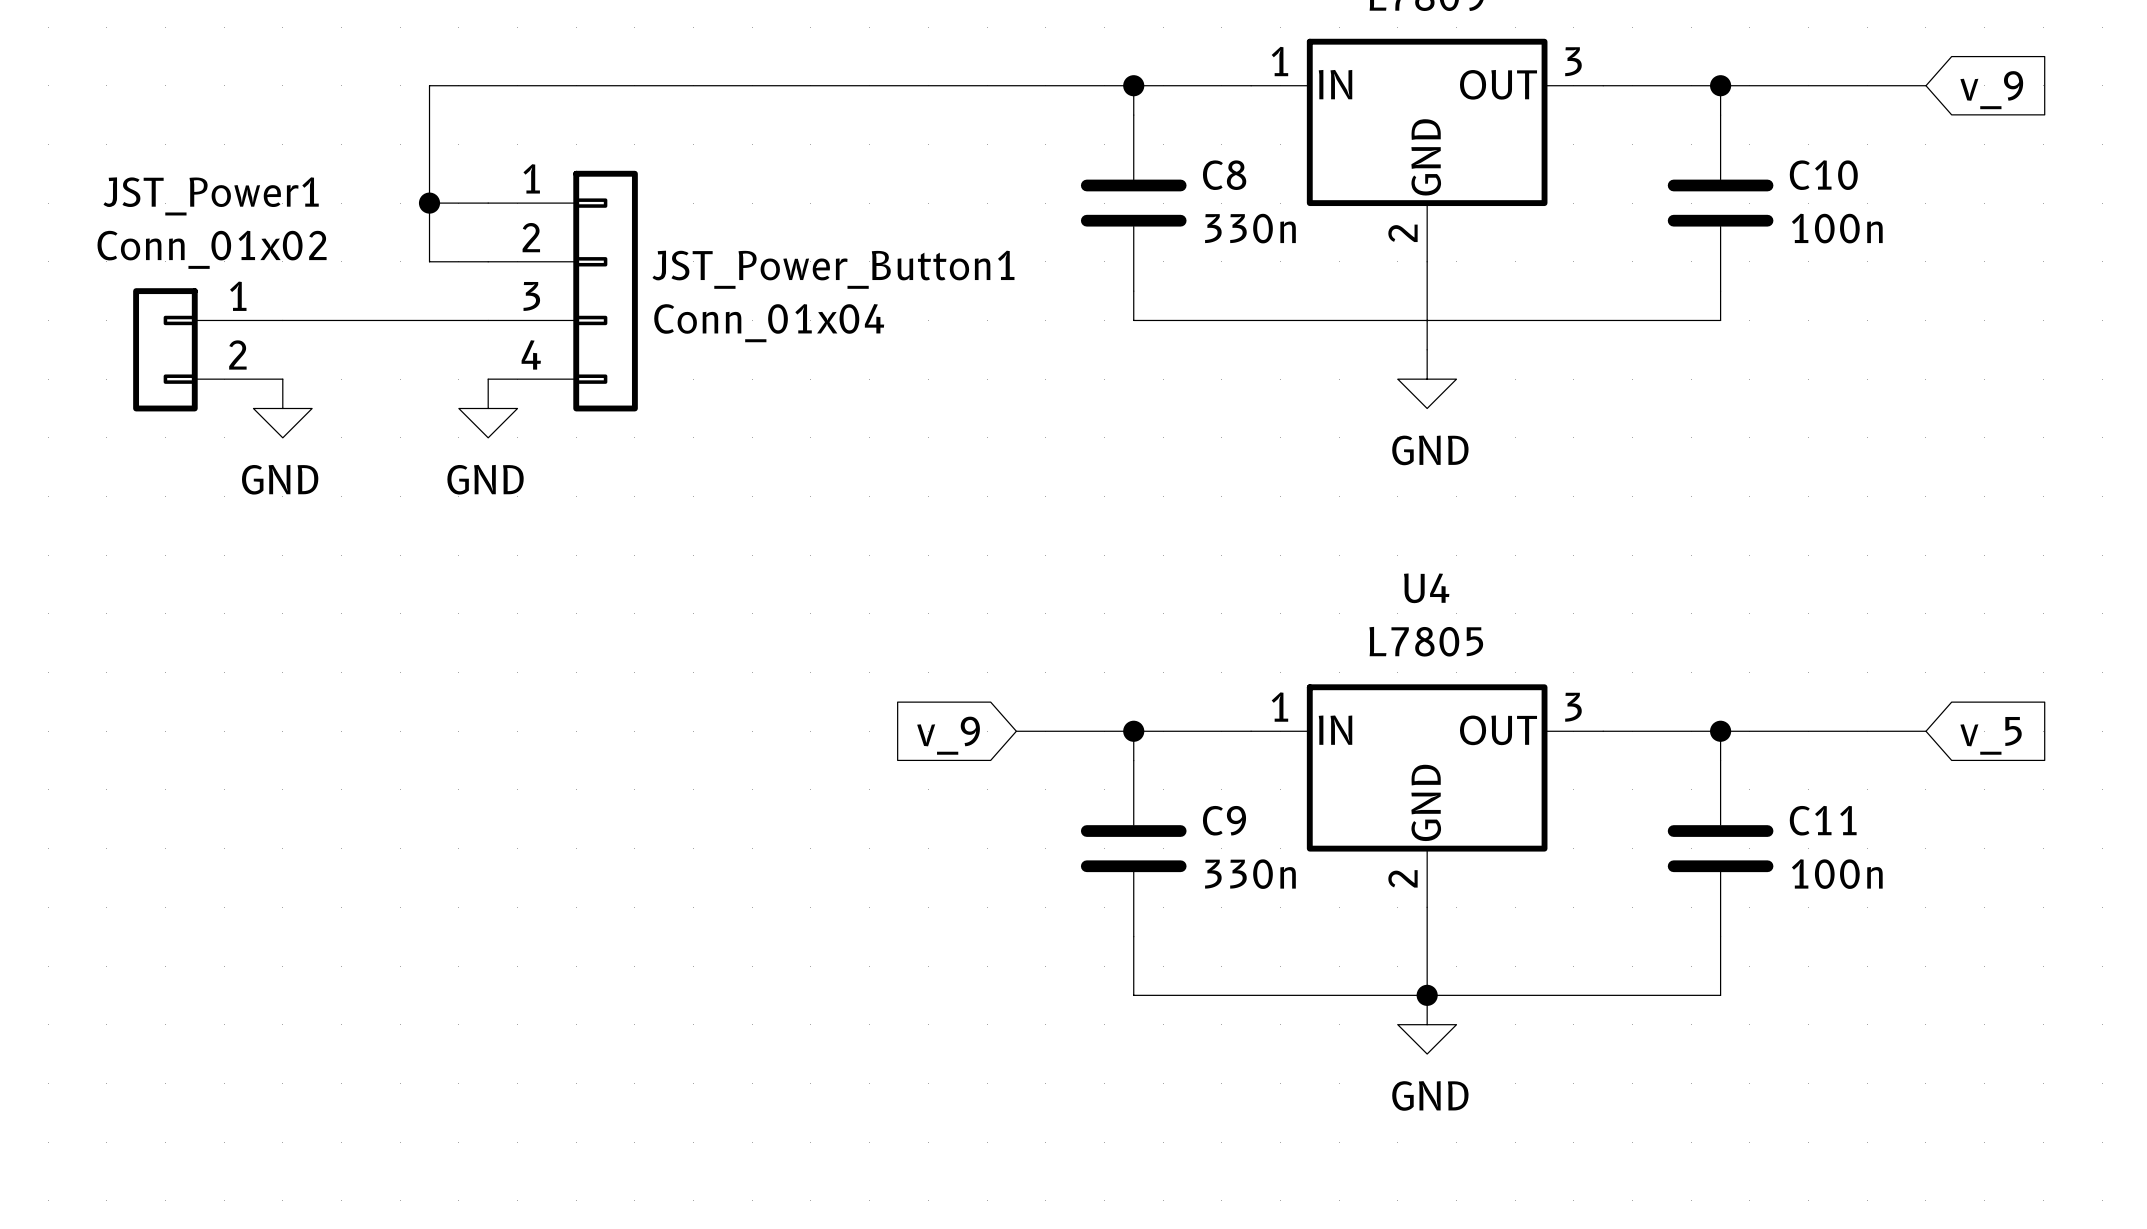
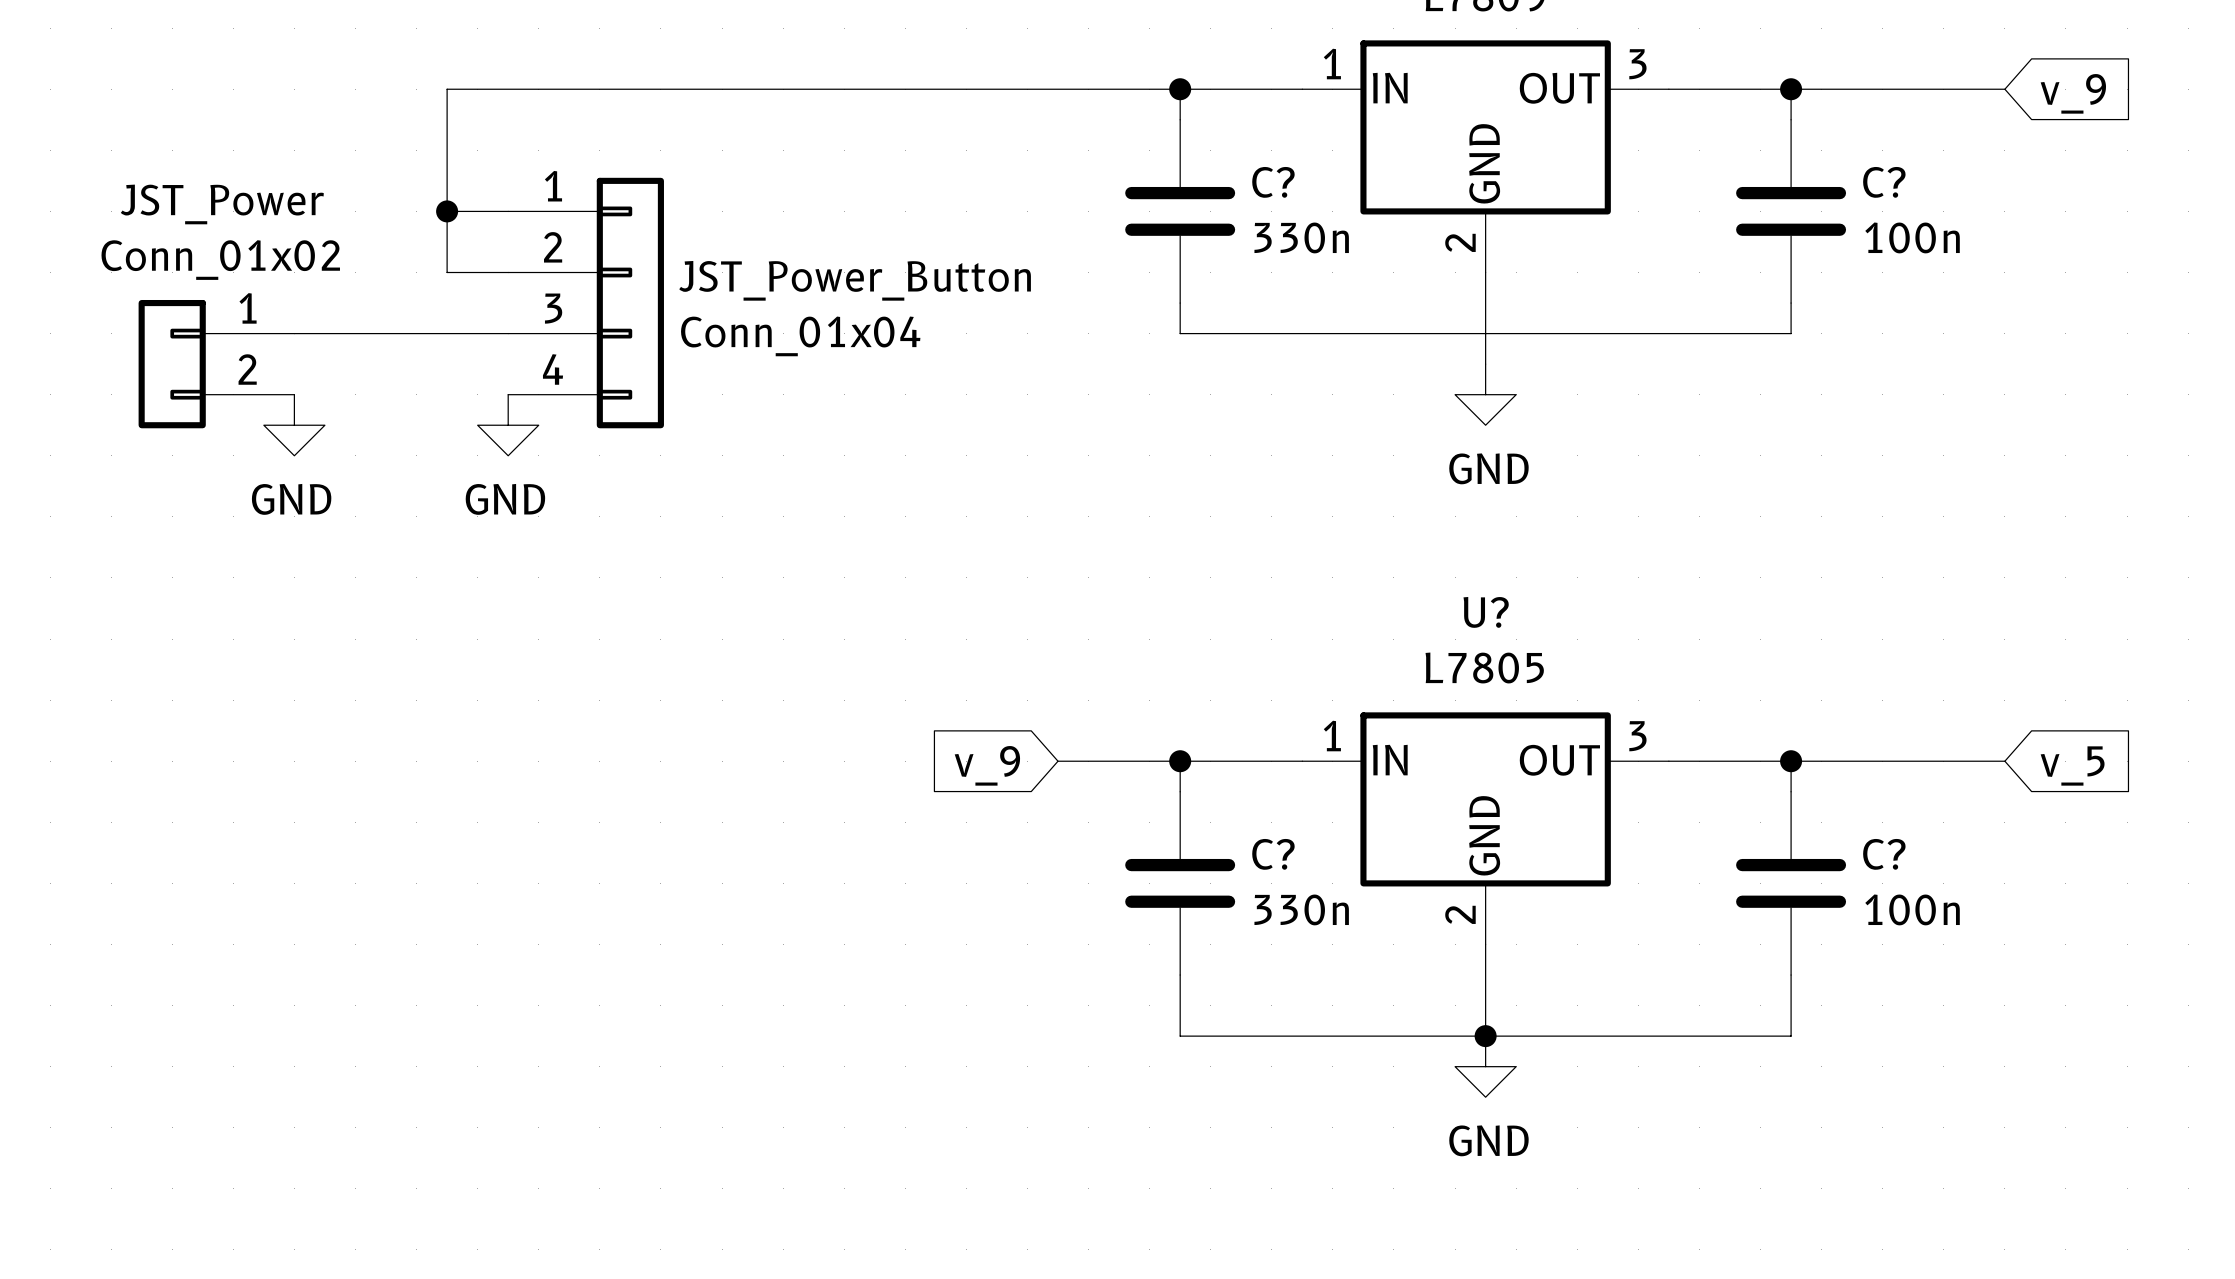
C8 name: C8 (1224, 175) -> C? (1273, 182)
C10 name: C10 (1823, 175) -> C? (1884, 182)
JST_Power1 name: JST_Power1 (211, 196) -> JST_Power (222, 204)
JST_Power_Button1 name: JST_Power_Button1 (833, 269) -> JST_Power_Button (855, 280)
U4 name: U4 (1426, 588) -> U? (1486, 612)
C9 name: C9 (1224, 820) -> C? (1273, 854)
C11 name: C11 (1823, 820) -> C? (1884, 854)

